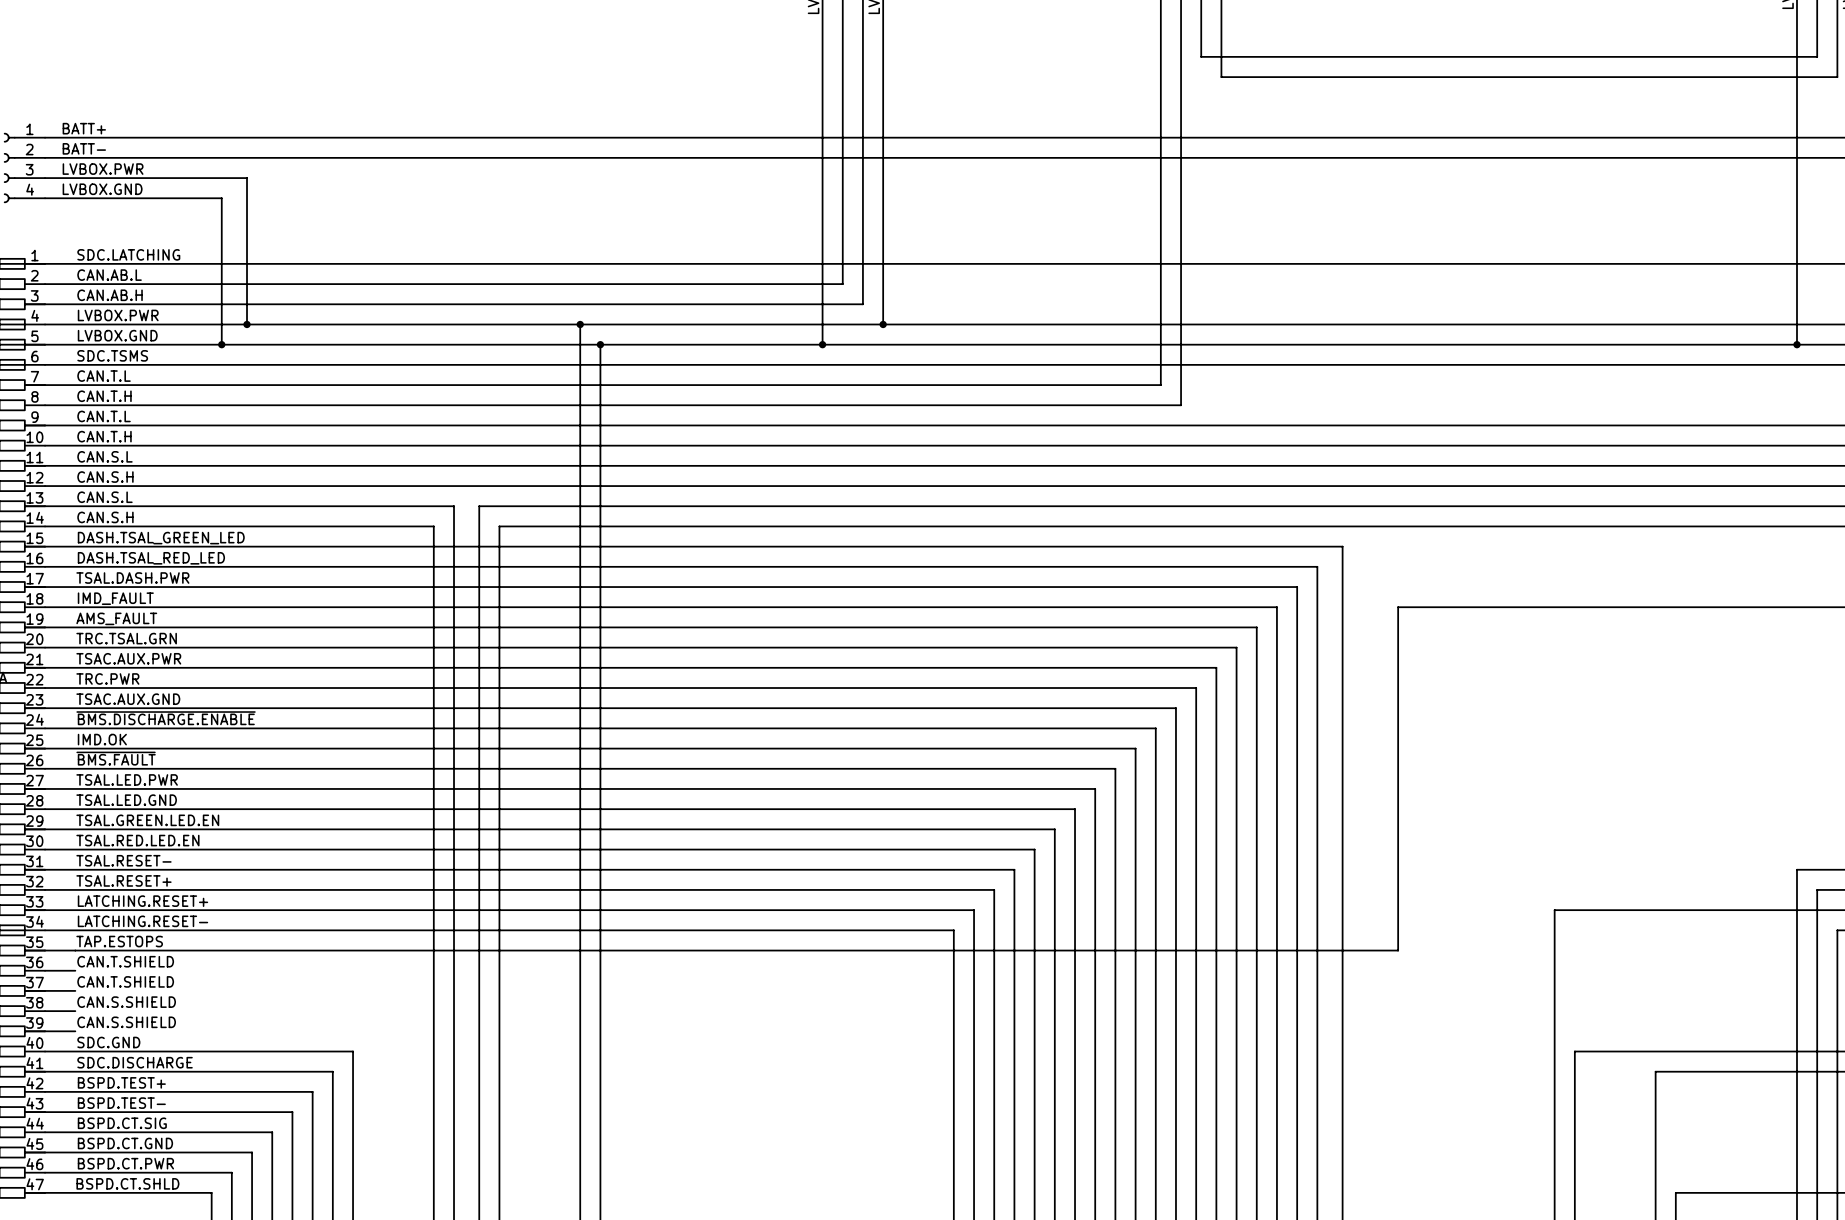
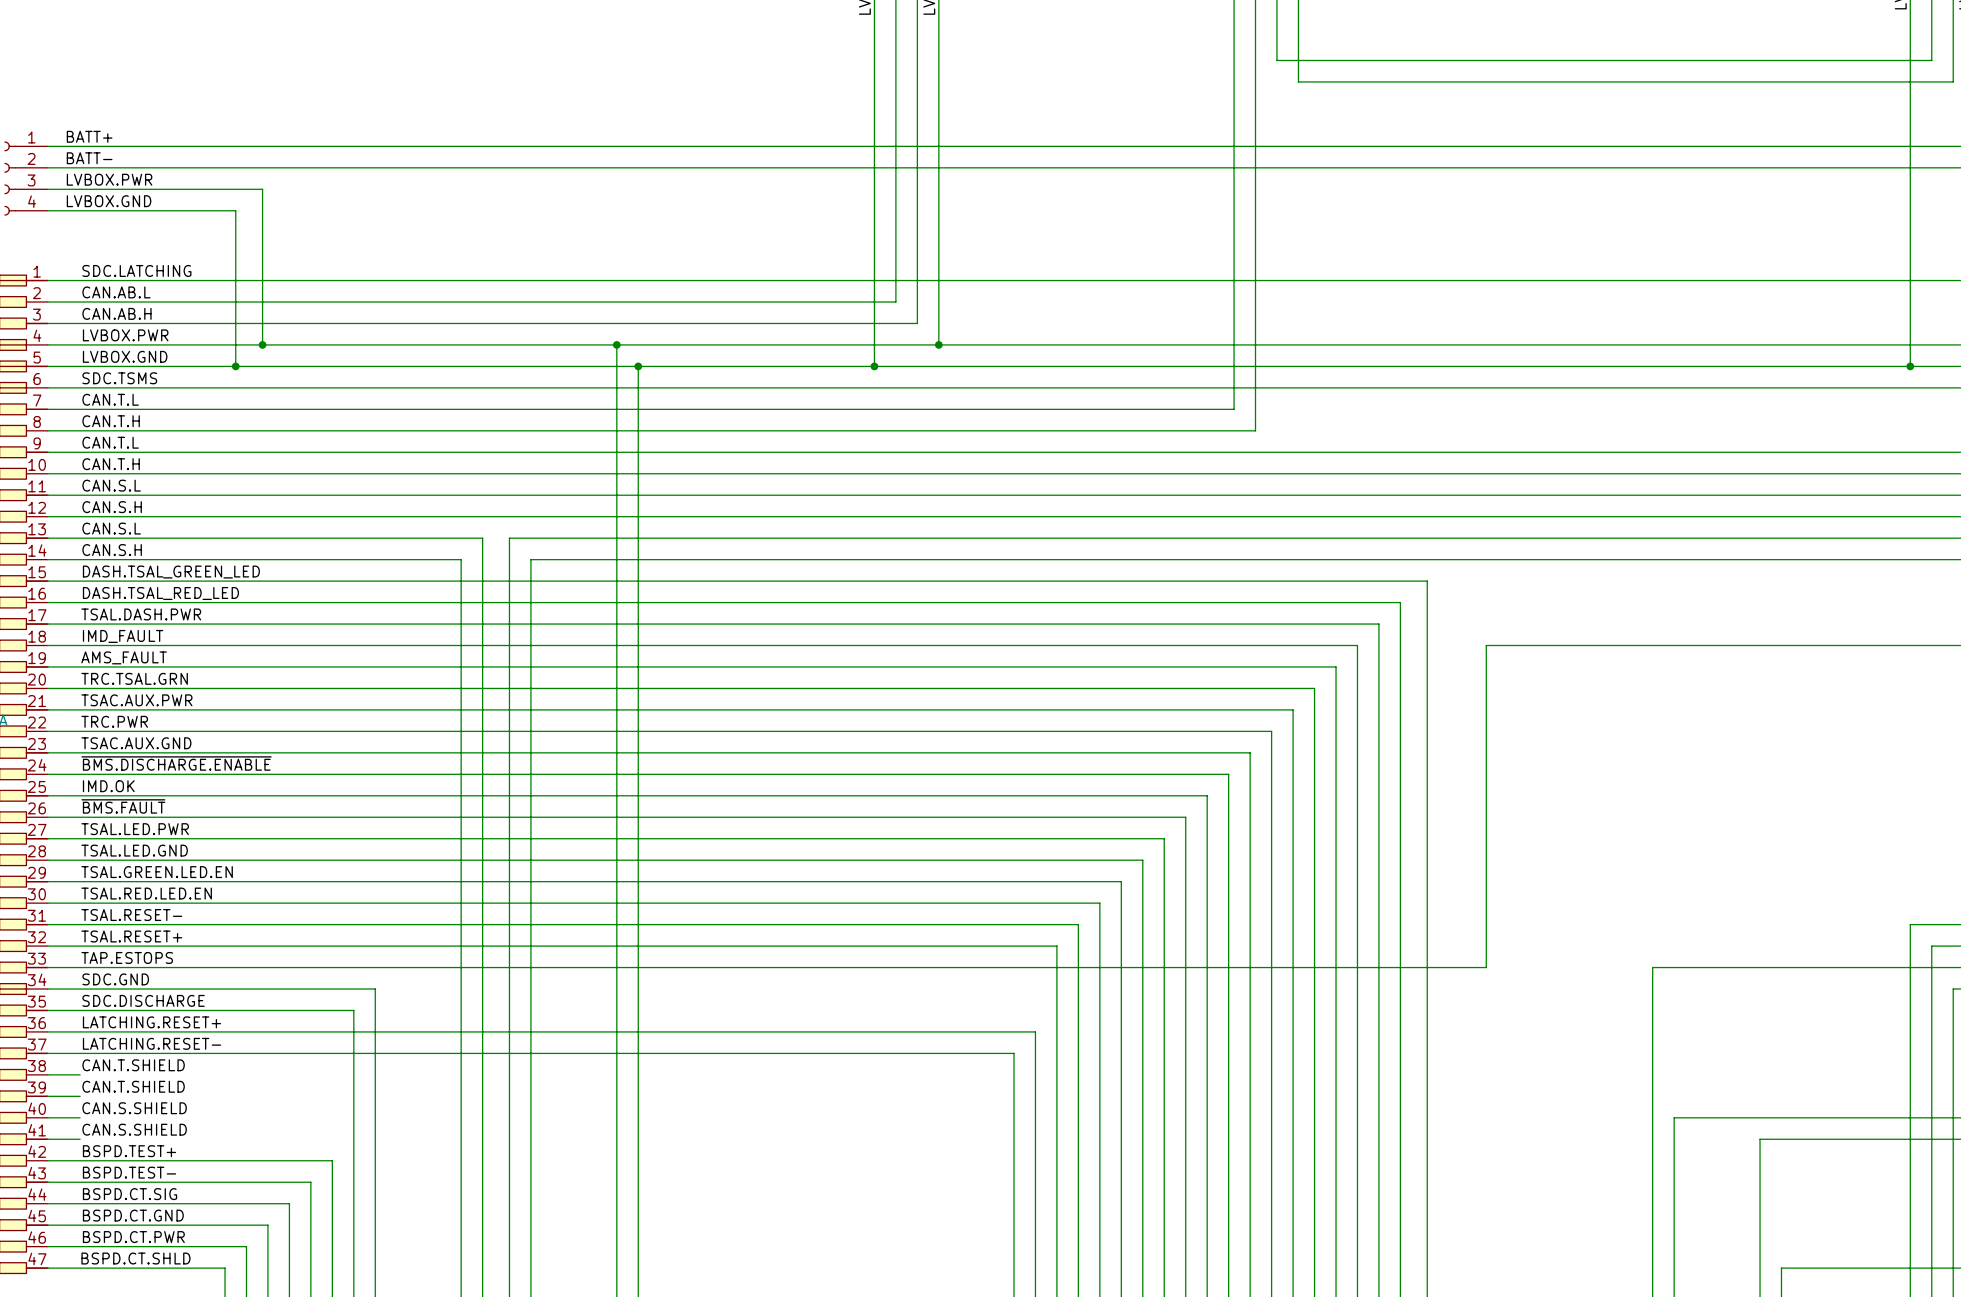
label: LATCHING.RESET+ (142, 901) -> TAP.ESTOPS (127, 957)
wire: (974, 910) (974, 970) -> (1035, 967) (1486, 967)
wire: (1398, 910) (1398, 950) (332, 950) -> none
label: LATCHING.RESET- (142, 921) -> SDC.GND (115, 979)
wire: (353, 930) (953, 930) (953, 990) -> (80, 1053) (1013, 1053)
label: TAP.ESTOPS (119, 941) -> SDC.DISCHARGE (143, 1000)
label: CAN.T.SHIELD (125, 961) -> LATCHING.RESET+ (151, 1022)
wire: none -> (80, 1031) (1035, 1031)
label: CAN.T.SHIELD (125, 981) -> LATCHING.RESET- (151, 1043)
label: CAN.S.SHIELD (126, 1002) -> CAN.T.SHIELD (133, 1065)
label: CAN.S.SHIELD (126, 1022) -> CAN.T.SHIELD (133, 1086)
label: SDC.GND (108, 1042) -> CAN.S.SHIELD (134, 1108)
wire: (75, 1051) (353, 1051) -> (375, 989) (375, 1117)
label: SDC.DISCHARGE (135, 1062) -> CAN.S.SHIELD (134, 1129)
wire: (75, 1071) (332, 1071) -> (353, 1010) (353, 1139)

